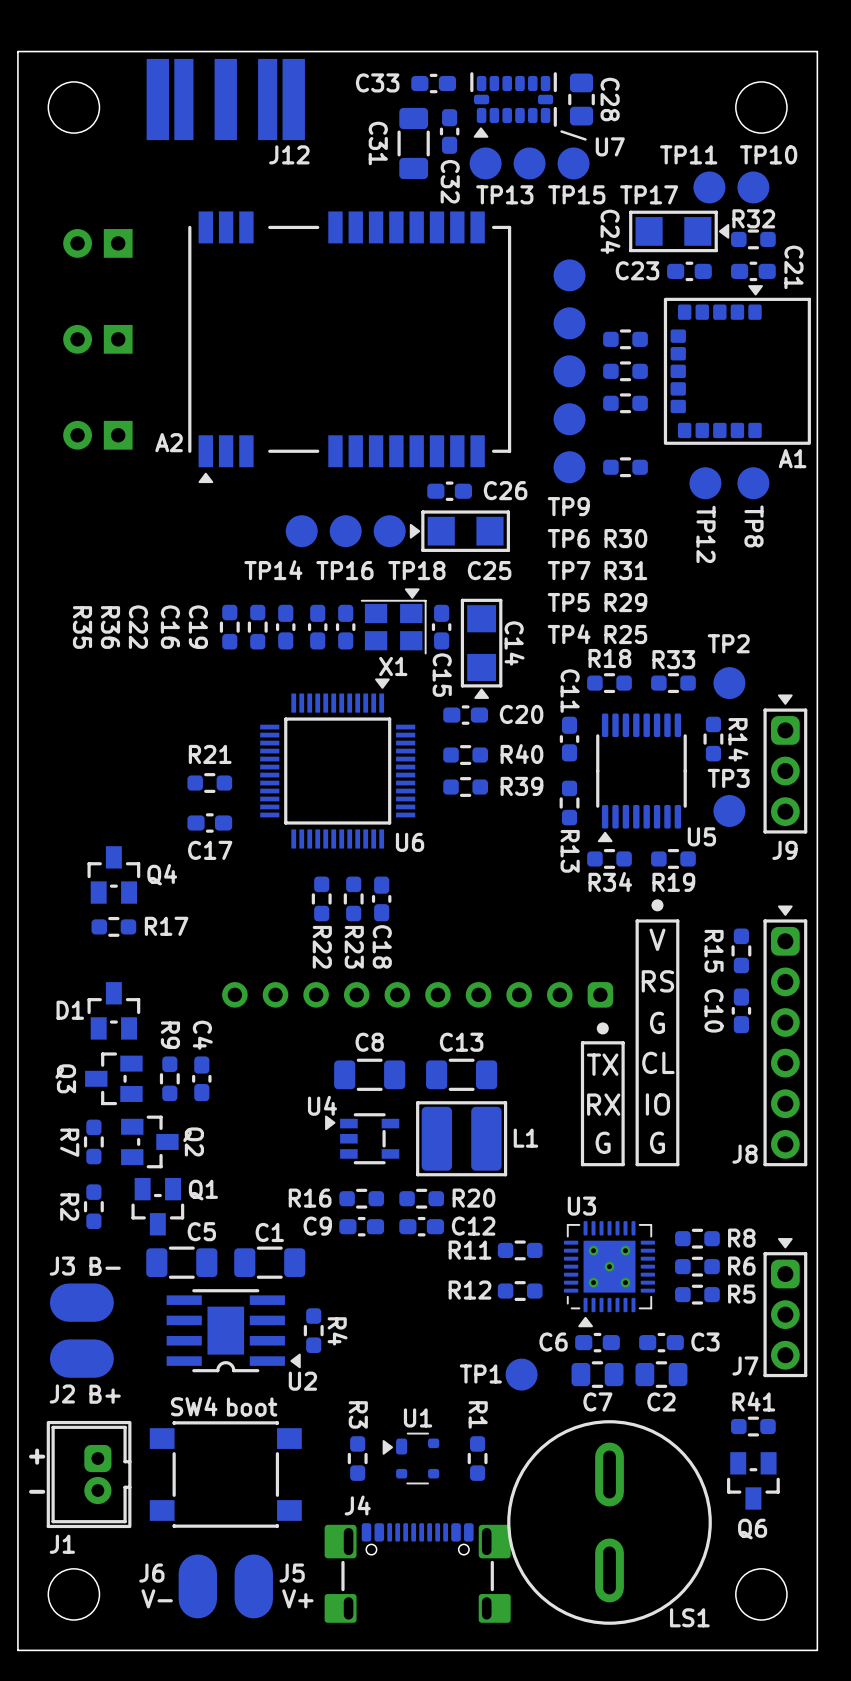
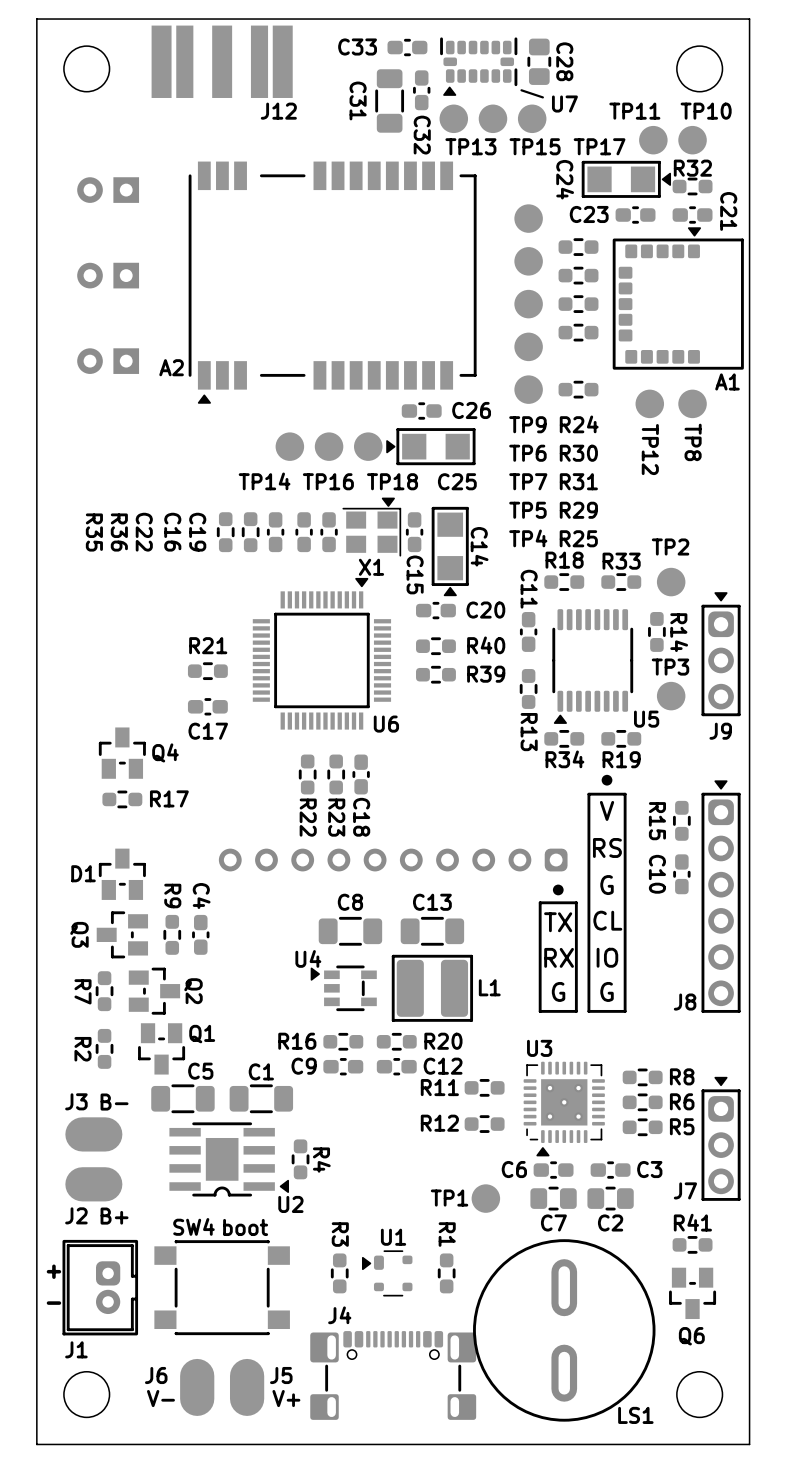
R24: none -> (578, 247)

